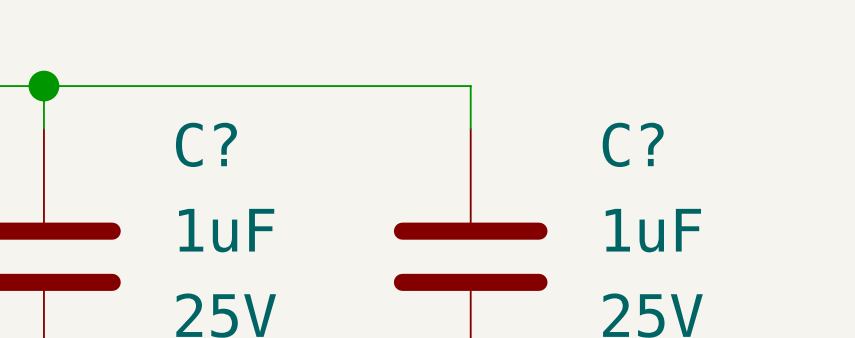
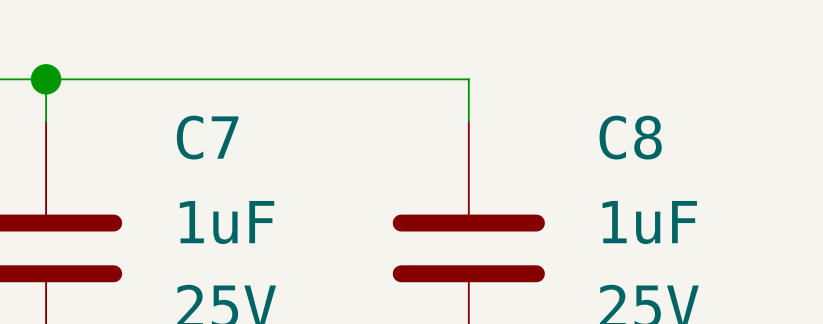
C? name: C? (206, 144) -> C7 (207, 137)
C? name: C? (633, 144) -> C8 (630, 137)

